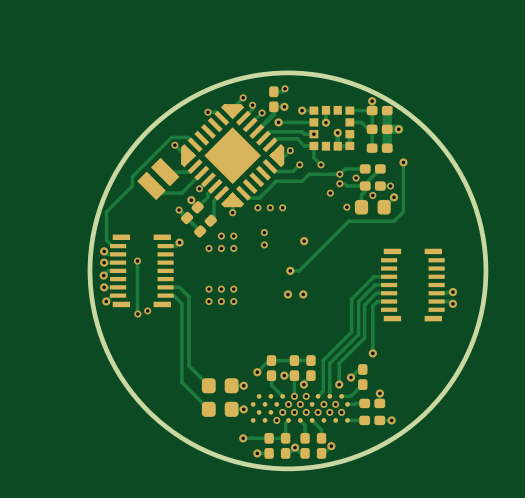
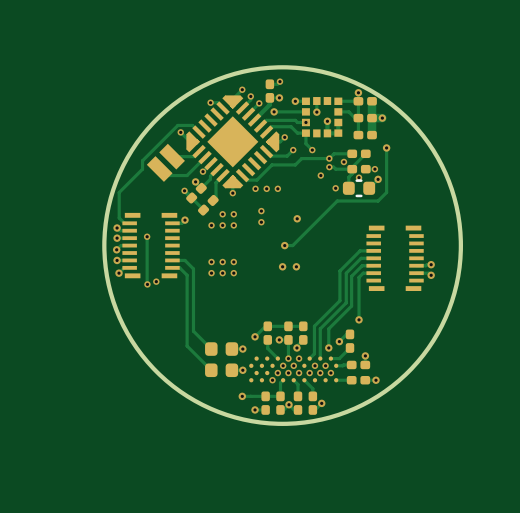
part footprint: [354, 199, 391, 215] -> [342, 179, 376, 198]

